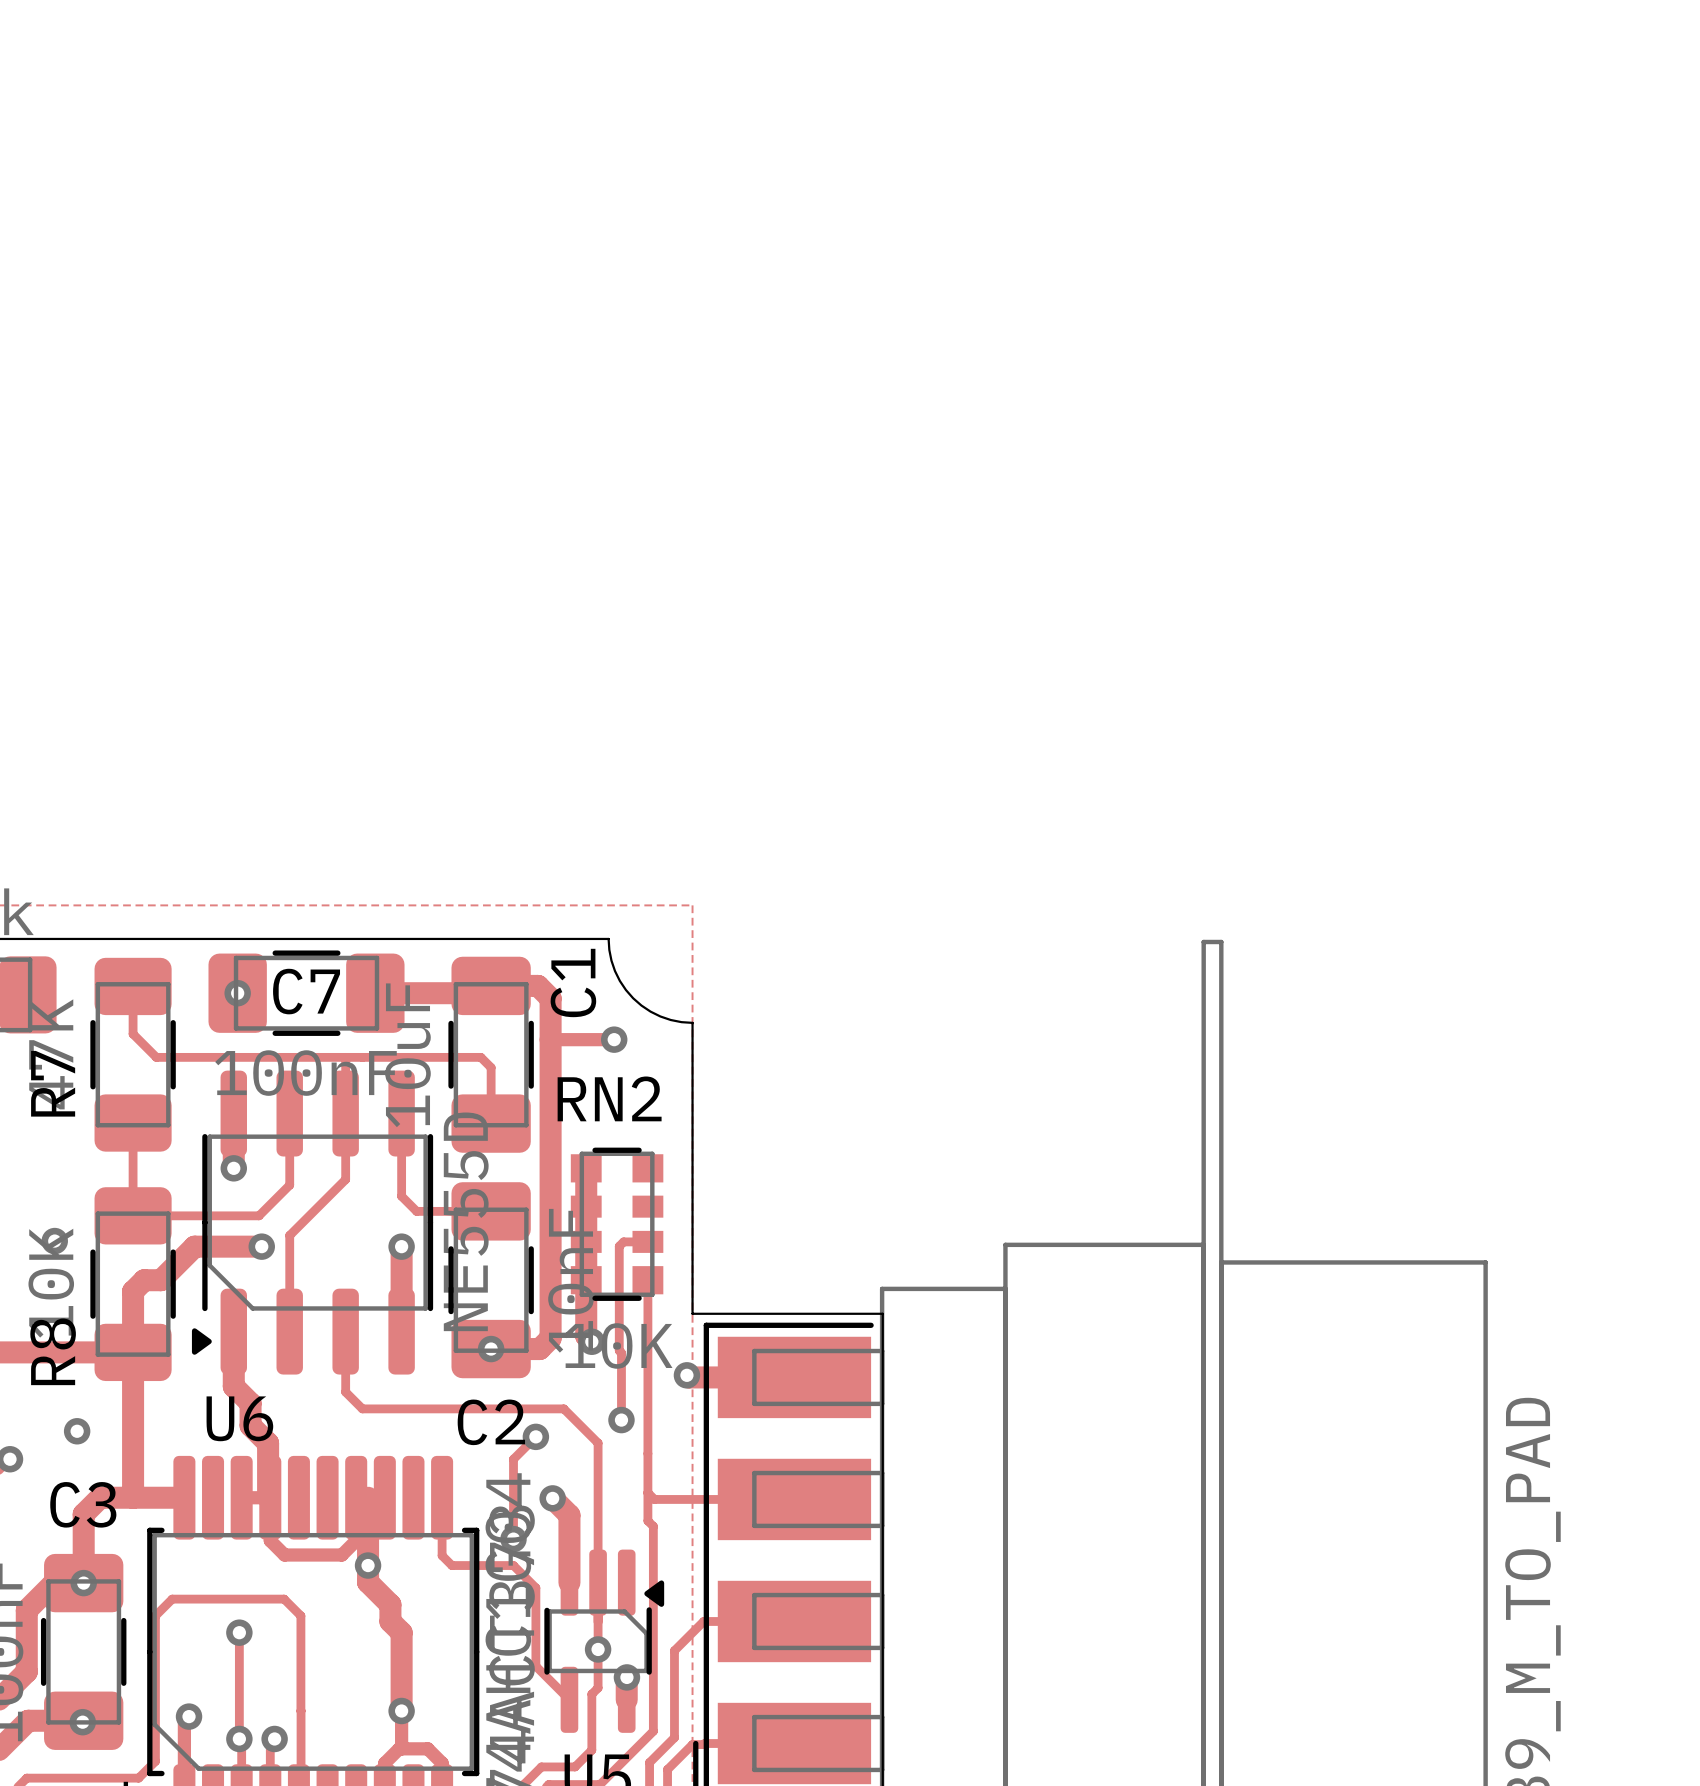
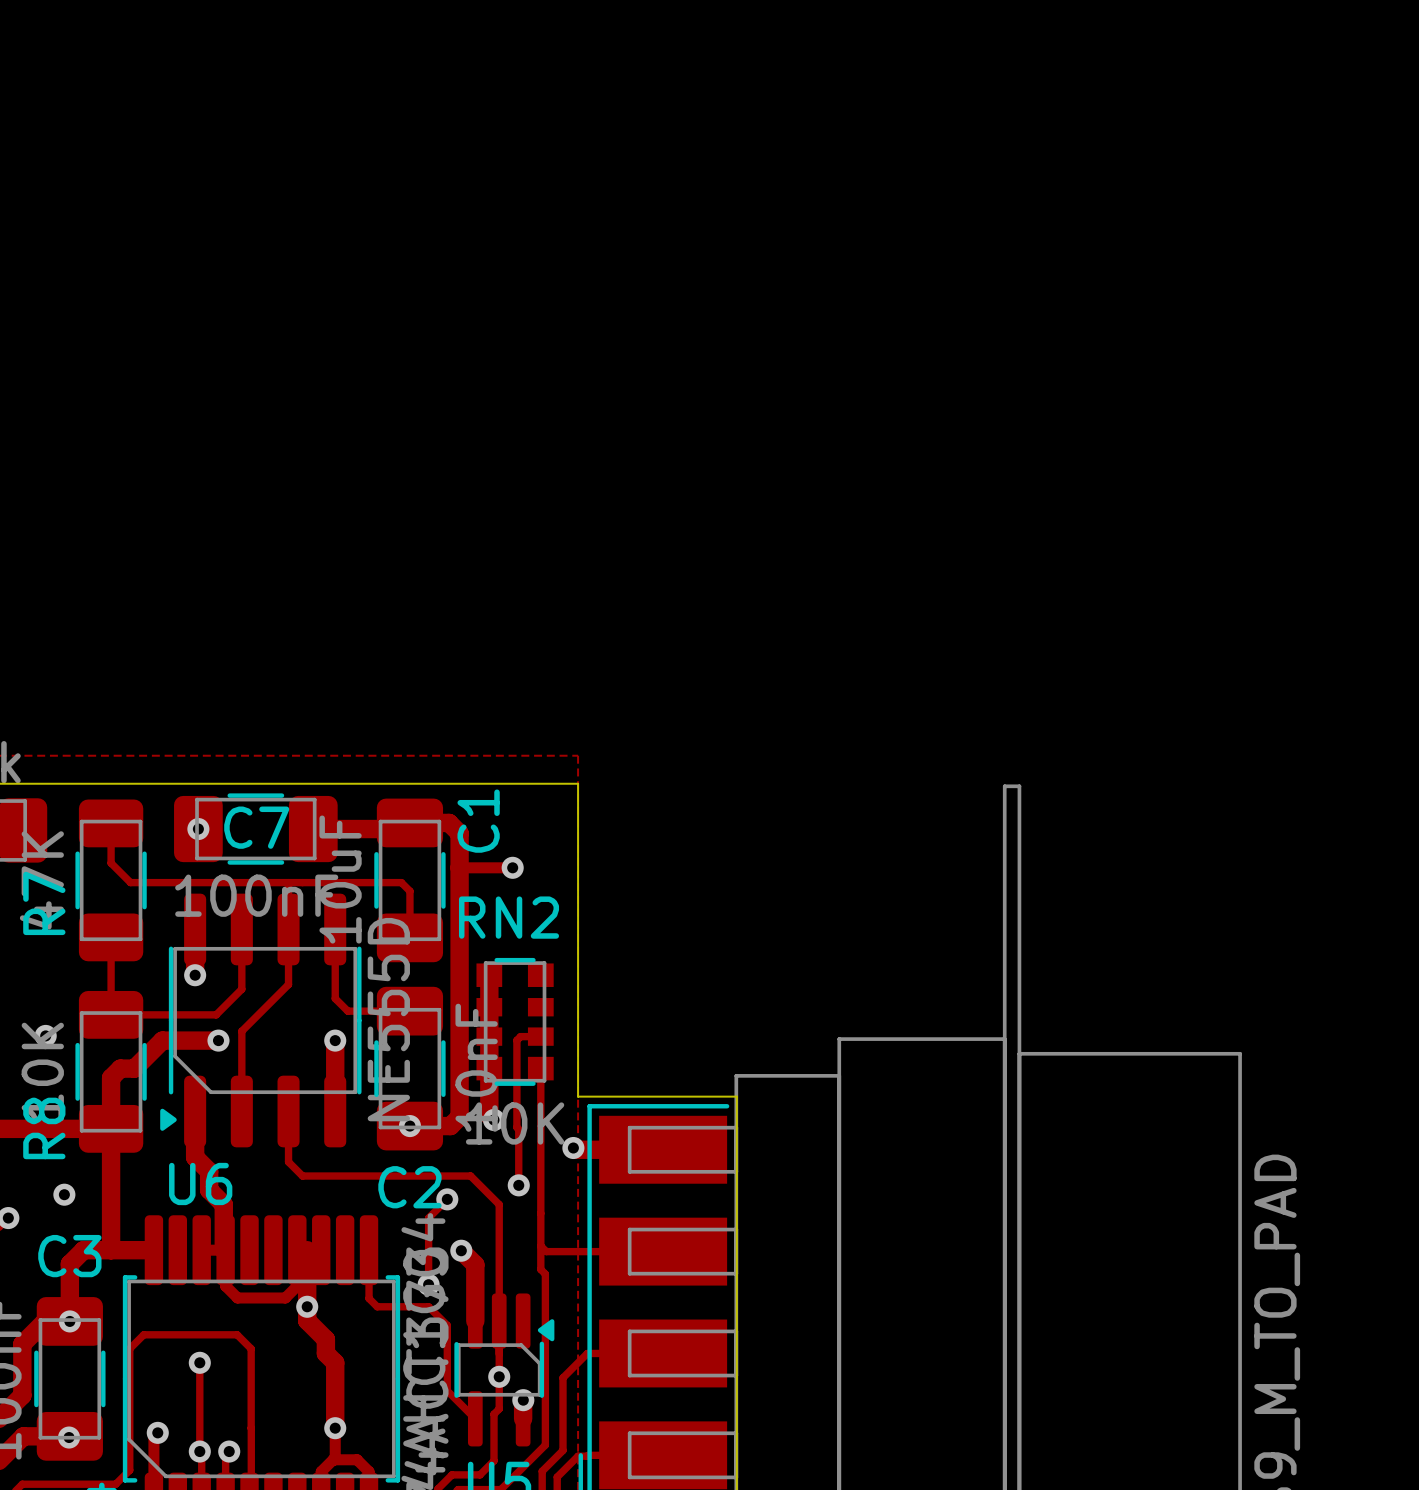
board edge: (608, 938) (615, 971) (633, 998) (660, 1016) (692, 1022) -> (508, 783) (578, 783) (578, 853)

